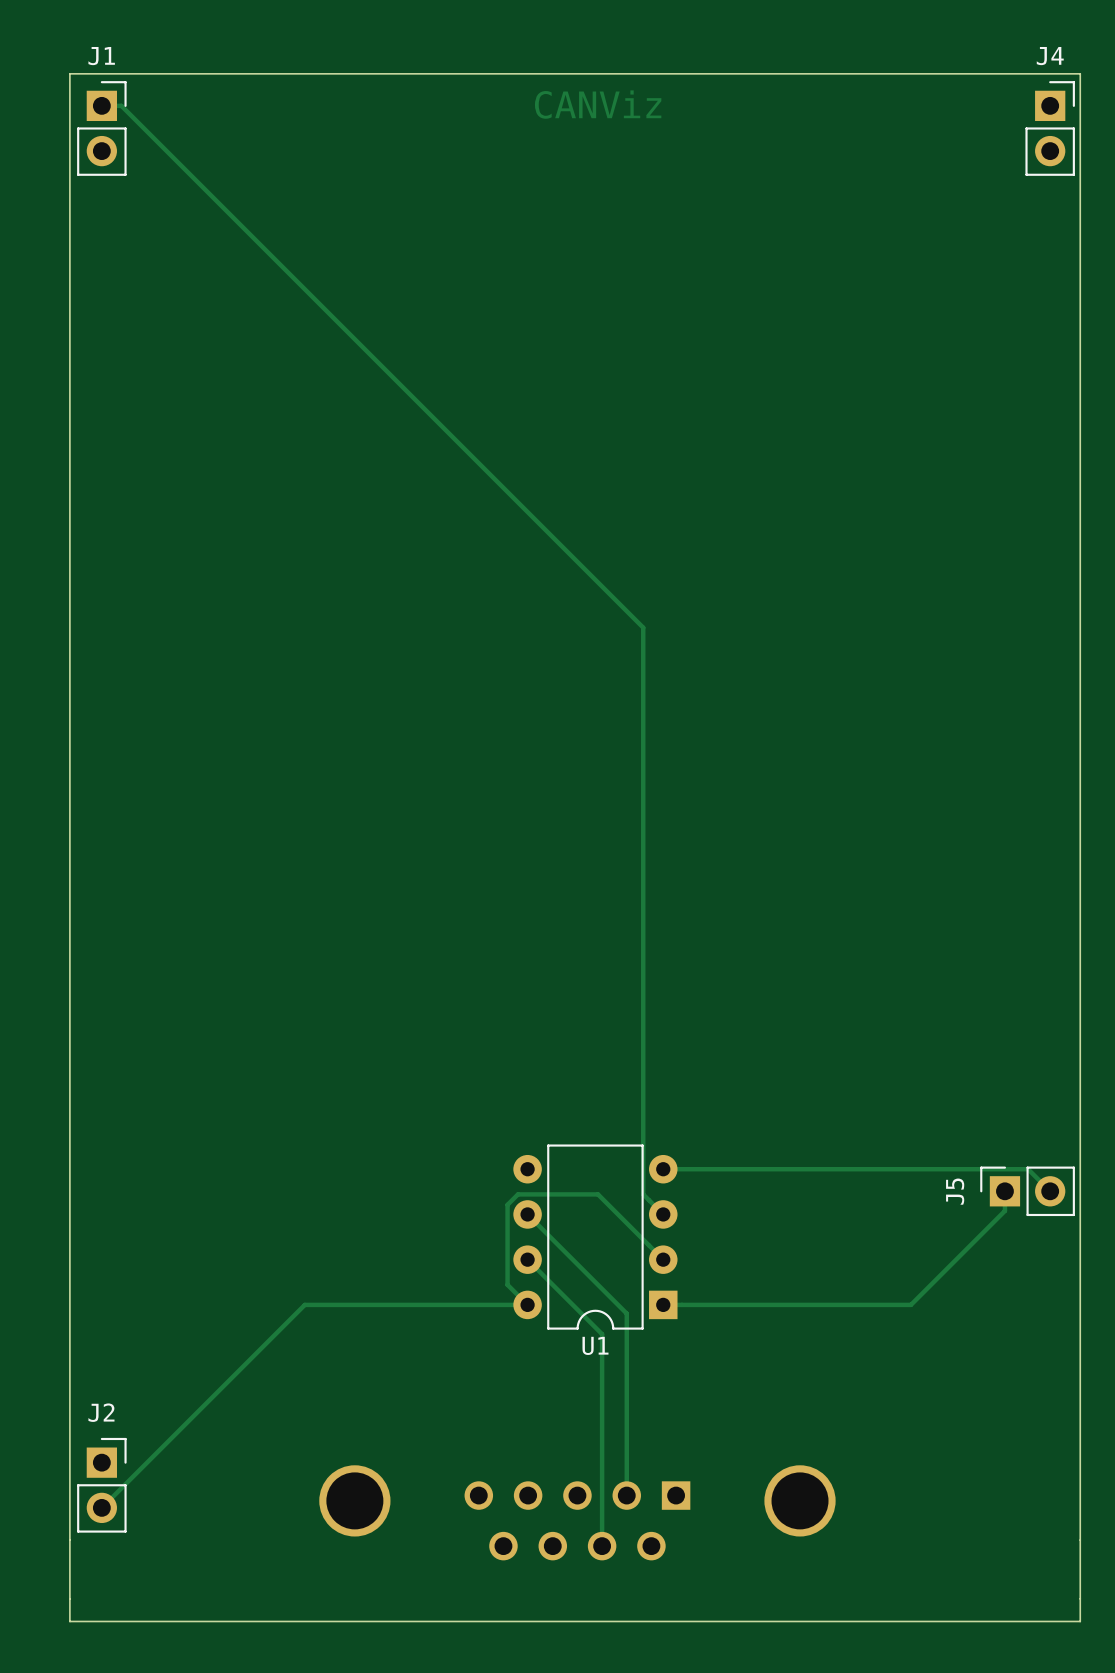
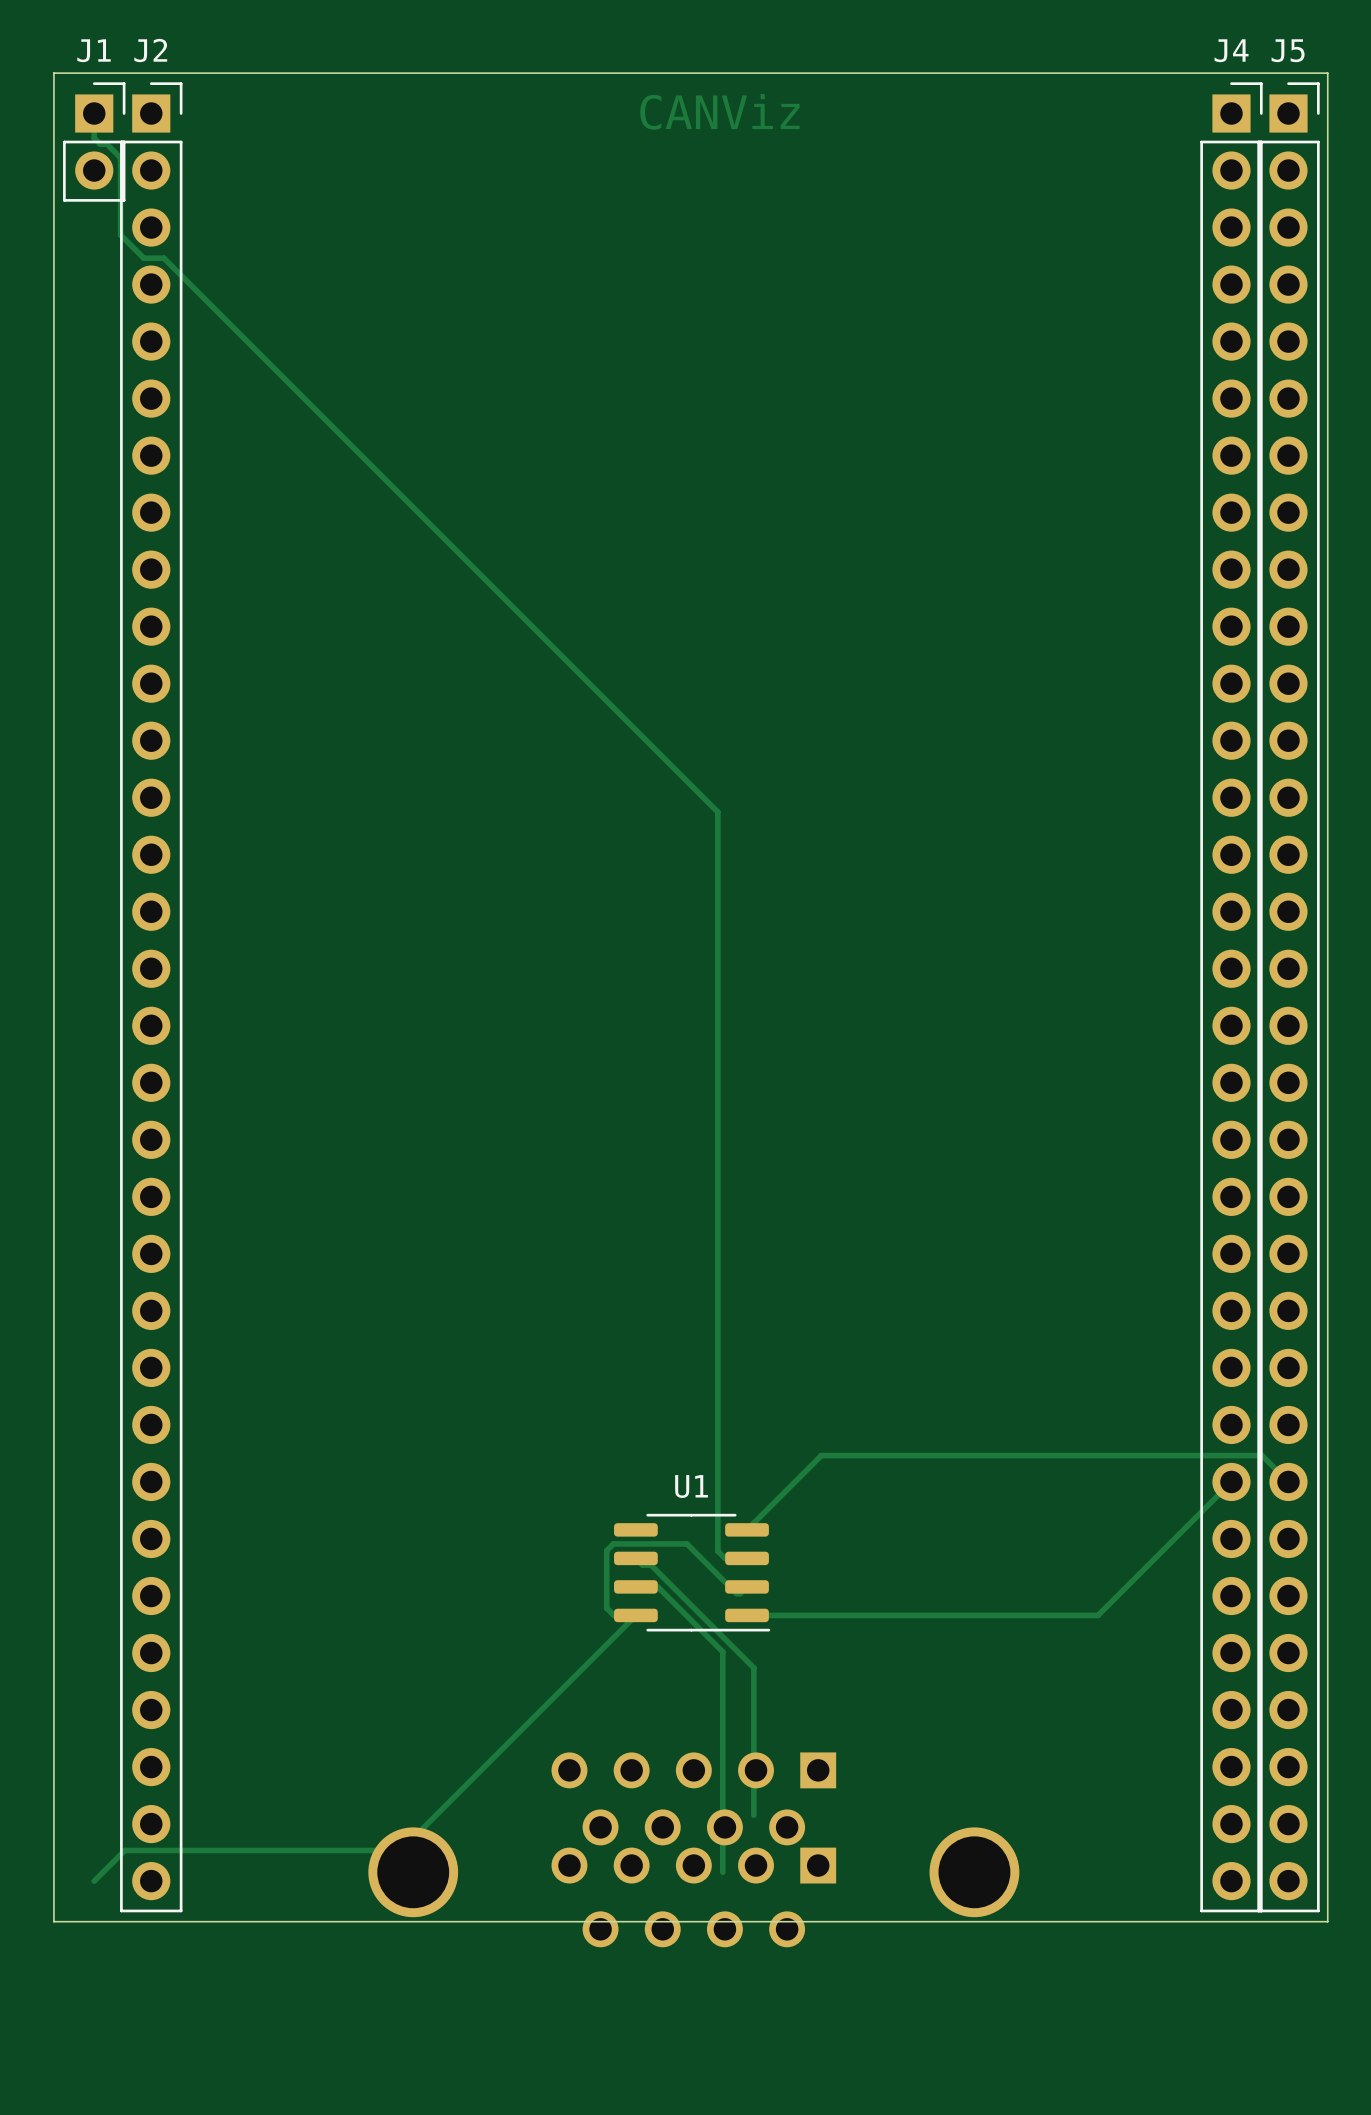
J4 name position: J4 (1050, 56) -> J4 (1231, 50)
J4 footprint: [1025, 81, 1075, 176] -> [1200, 82, 1263, 1913]
track: (101, 105) (121, 105) (643, 627) (643, 1194) (663, 1214) -> (94, 113) (94, 138) (100, 144) (106, 144) (120, 157) (120, 235) (143, 258) (163, 258) (717, 812) (717, 1551) (725, 1558) (747, 1558)
U1 footprint: [513, 1144, 678, 1330] -> [614, 1513, 771, 1632]
J5 footprint: [980, 1166, 1075, 1217] -> [1257, 82, 1320, 1913]
track: (663, 1169) (1028, 1169) (1050, 1191) -> none
J5 name position: J5 (955, 1191) -> J5 (1288, 50)
track: none -> (1231, 1481) (1098, 1615) (747, 1615)
track: (1004, 1191) (1004, 1210) (910, 1304) (663, 1304) -> none
track: none -> (1288, 1481) (1262, 1455) (821, 1455) (747, 1529)
track: (527, 1214) (626, 1313) (626, 1495) -> none
track: none -> (635, 1558) (642, 1565) (651, 1565) (753, 1667) (753, 1815)
track: (527, 1259) (602, 1334) (602, 1546) -> none
track: (663, 1259) (598, 1194) (517, 1194) (507, 1204) (507, 1284) (527, 1304) (304, 1304) (126, 1483) -> (632, 1615) (635, 1615) (400, 1850) (124, 1850)
track: none -> (635, 1586) (657, 1586) (722, 1651) (722, 1872)
track: none -> (747, 1586) (740, 1593) (736, 1593) (686, 1543) (613, 1543) (606, 1550) (606, 1608) (614, 1615) (632, 1615)
U1 name position: U1 (595, 1345) -> U1 (691, 1486)
J2 name position: J2 (101, 1412) -> J2 (150, 50)
J2 footprint: [77, 1437, 127, 1533] -> [120, 82, 183, 1913]
part: none -> (693, 1798)
board edge: (69, 1540) (69, 1621) (1080, 1621) (1080, 1540) -> (53, 1921) (1327, 1921)

